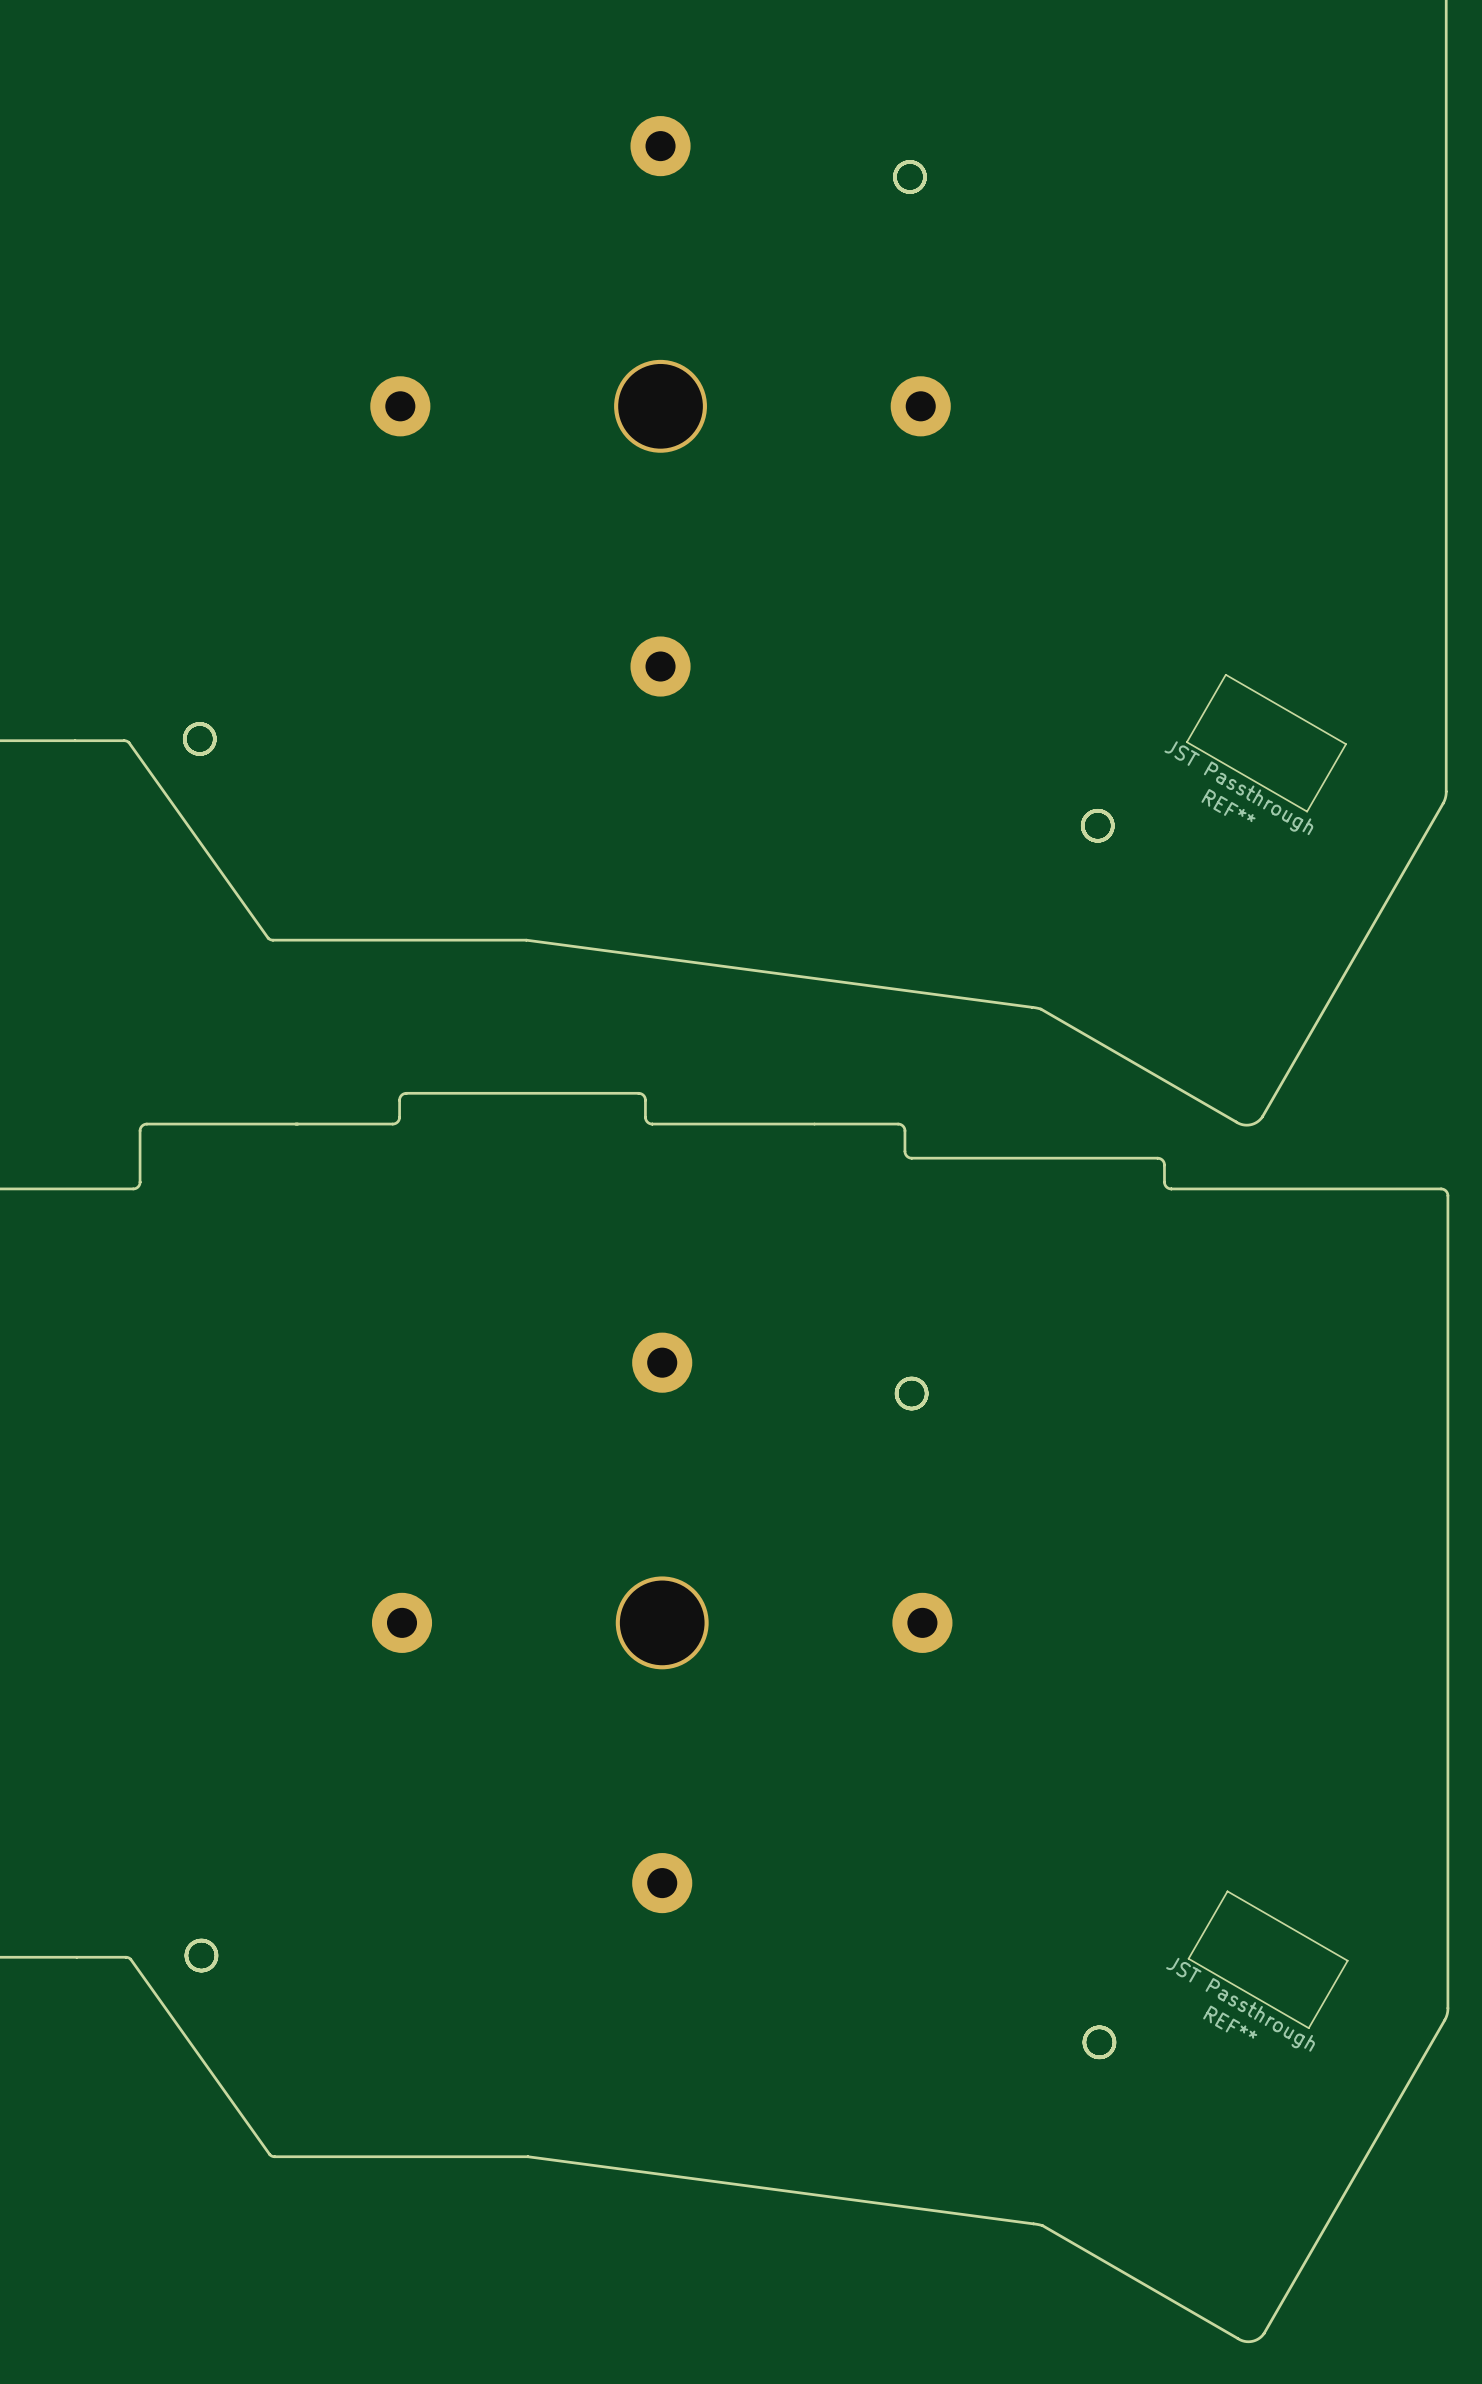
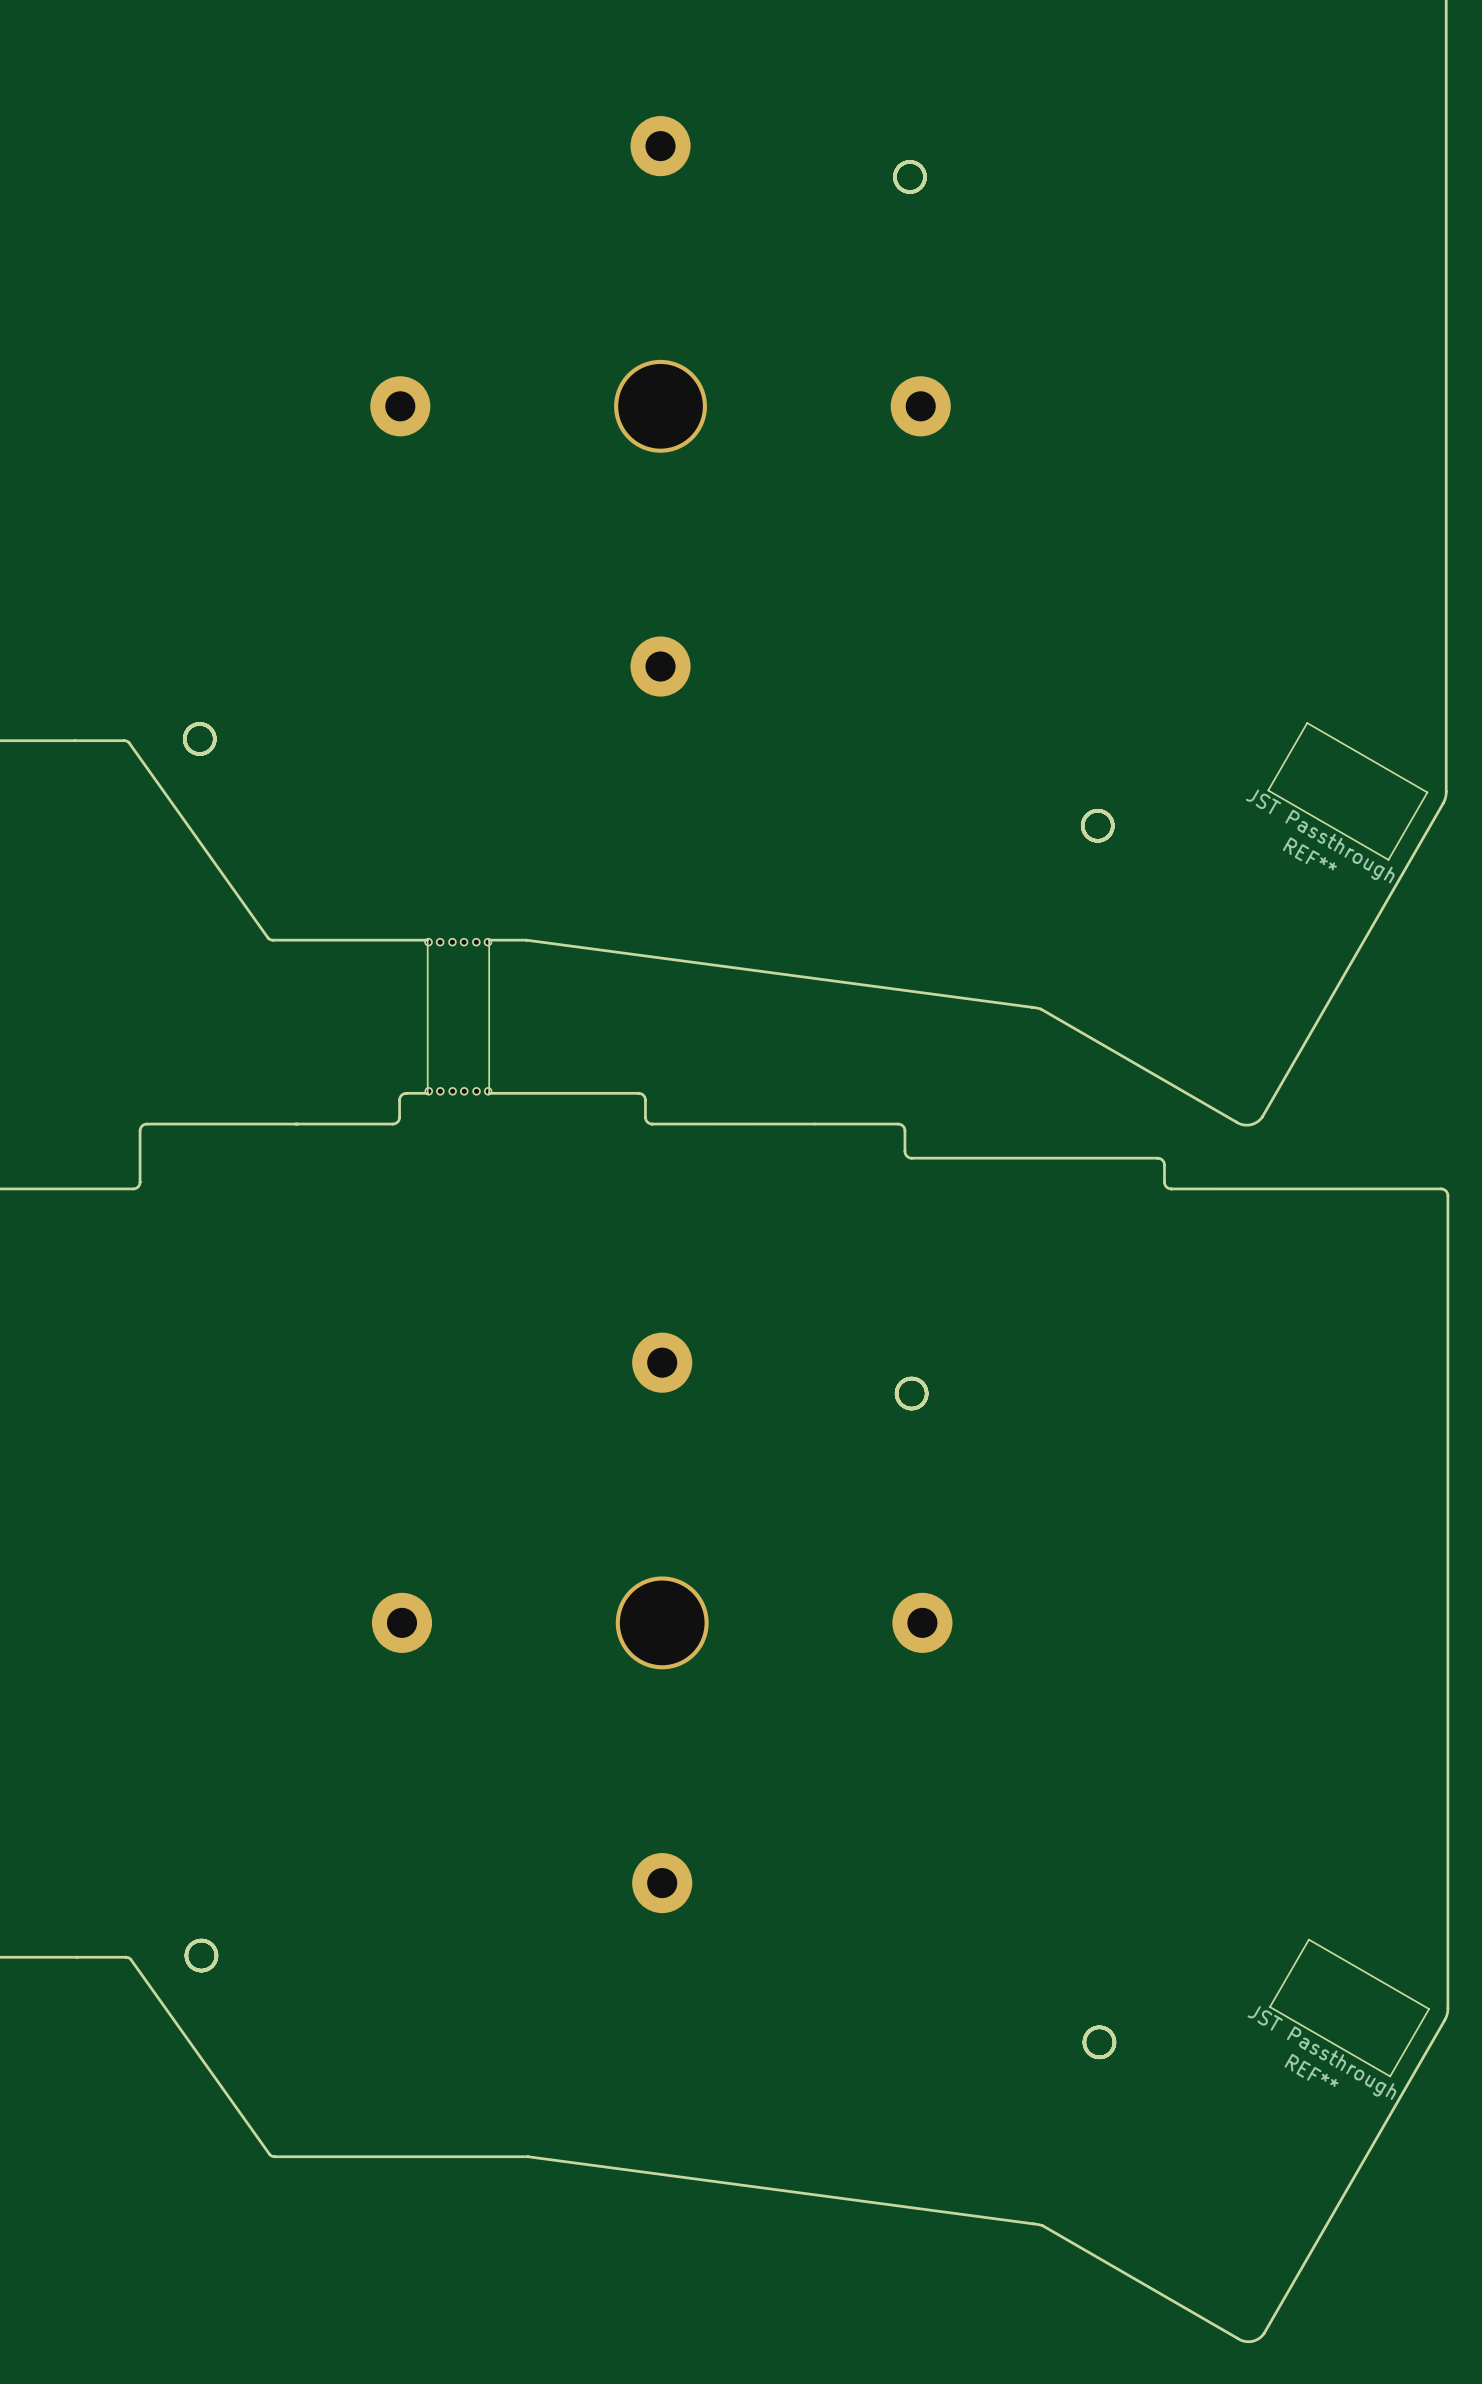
REF** position: (1266, 743) -> (1347, 791)
board edge: (427, 940) (489, 940) -> (489, 1094) (489, 940)
board edge: none -> (427, 940) (427, 1094)
part: none -> (434, 942)
part: none -> (458, 942)
part: none -> (482, 942)
part: none -> (434, 1091)
part: none -> (458, 1091)
part: none -> (482, 1091)
REF** position: (1268, 1959) -> (1349, 2008)

